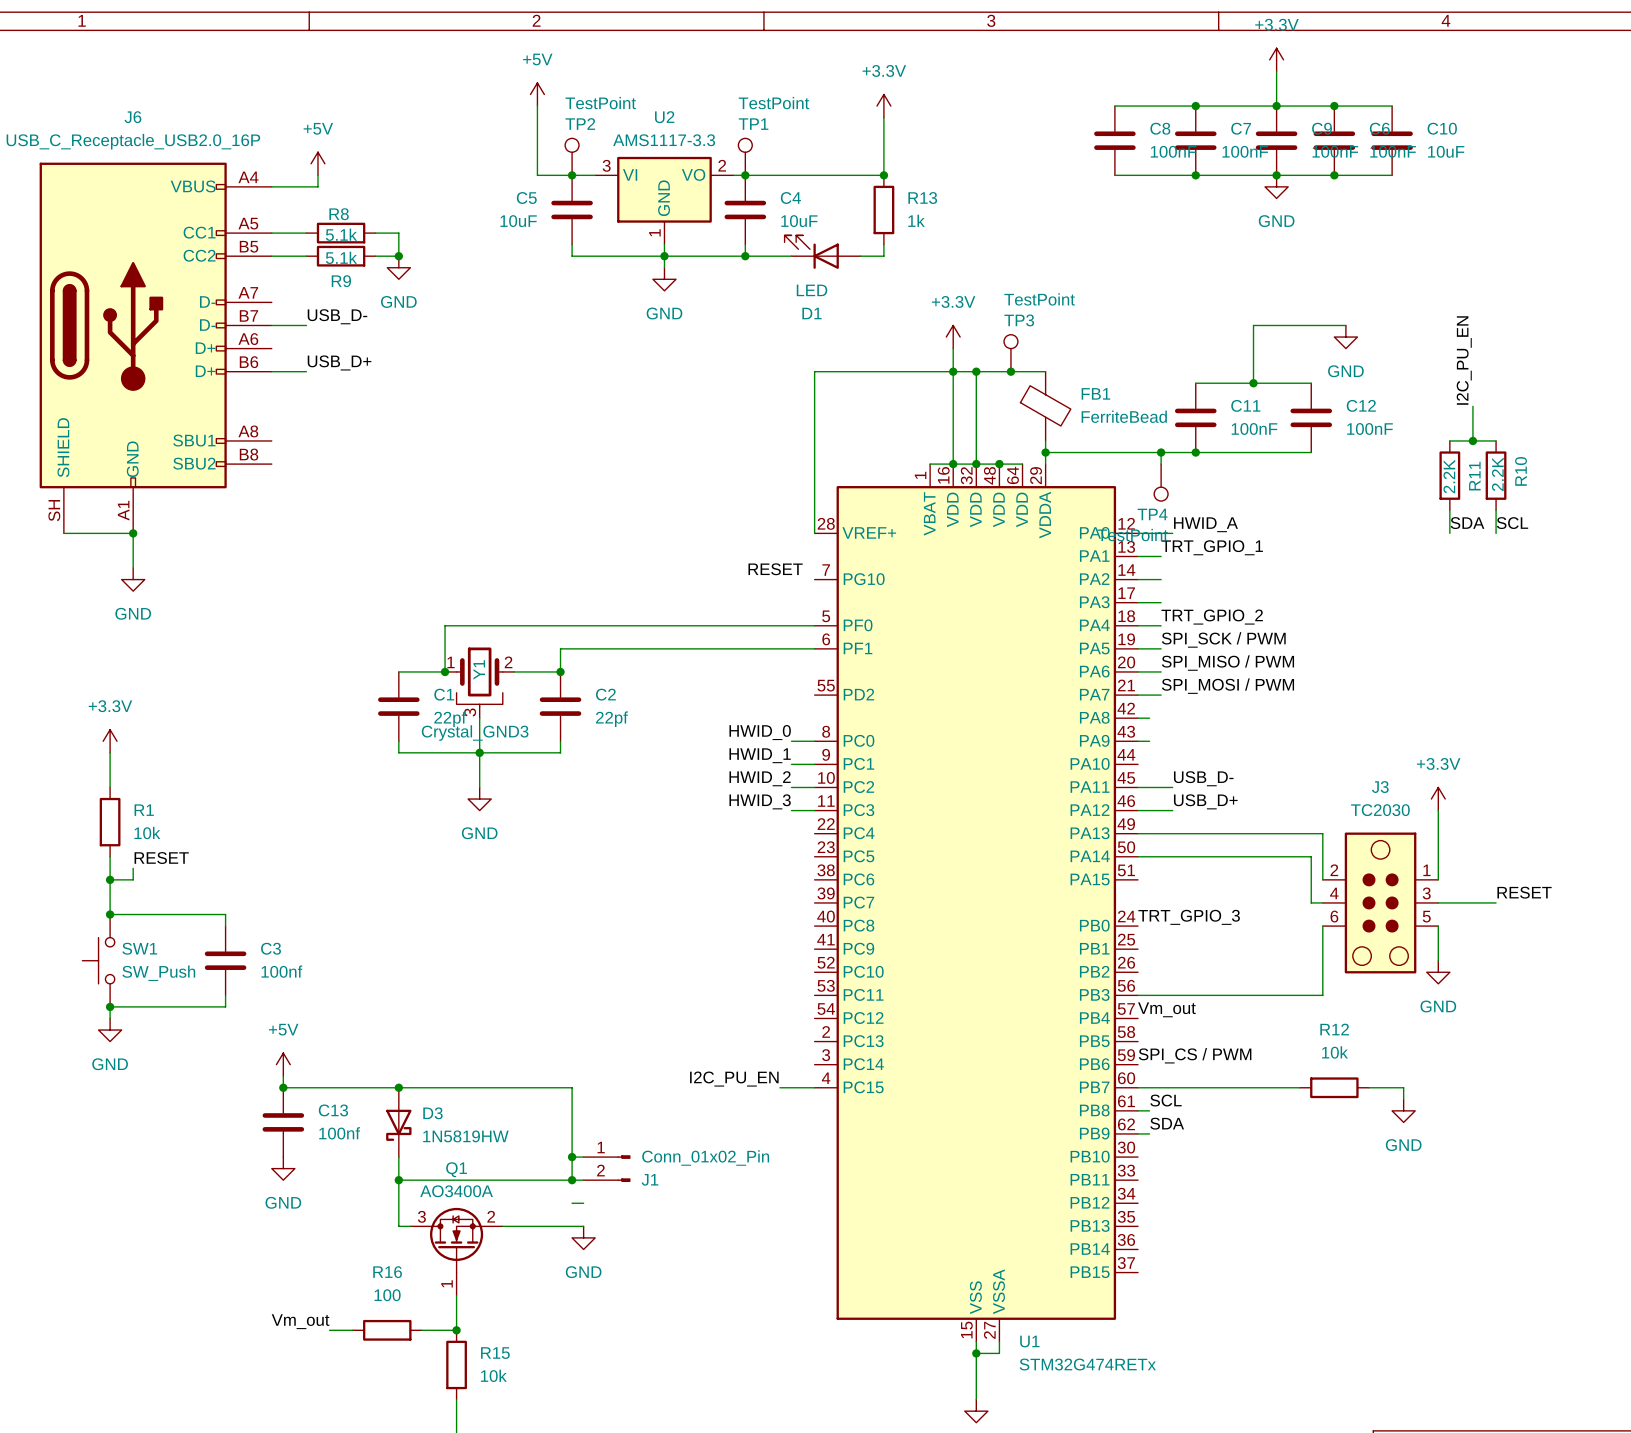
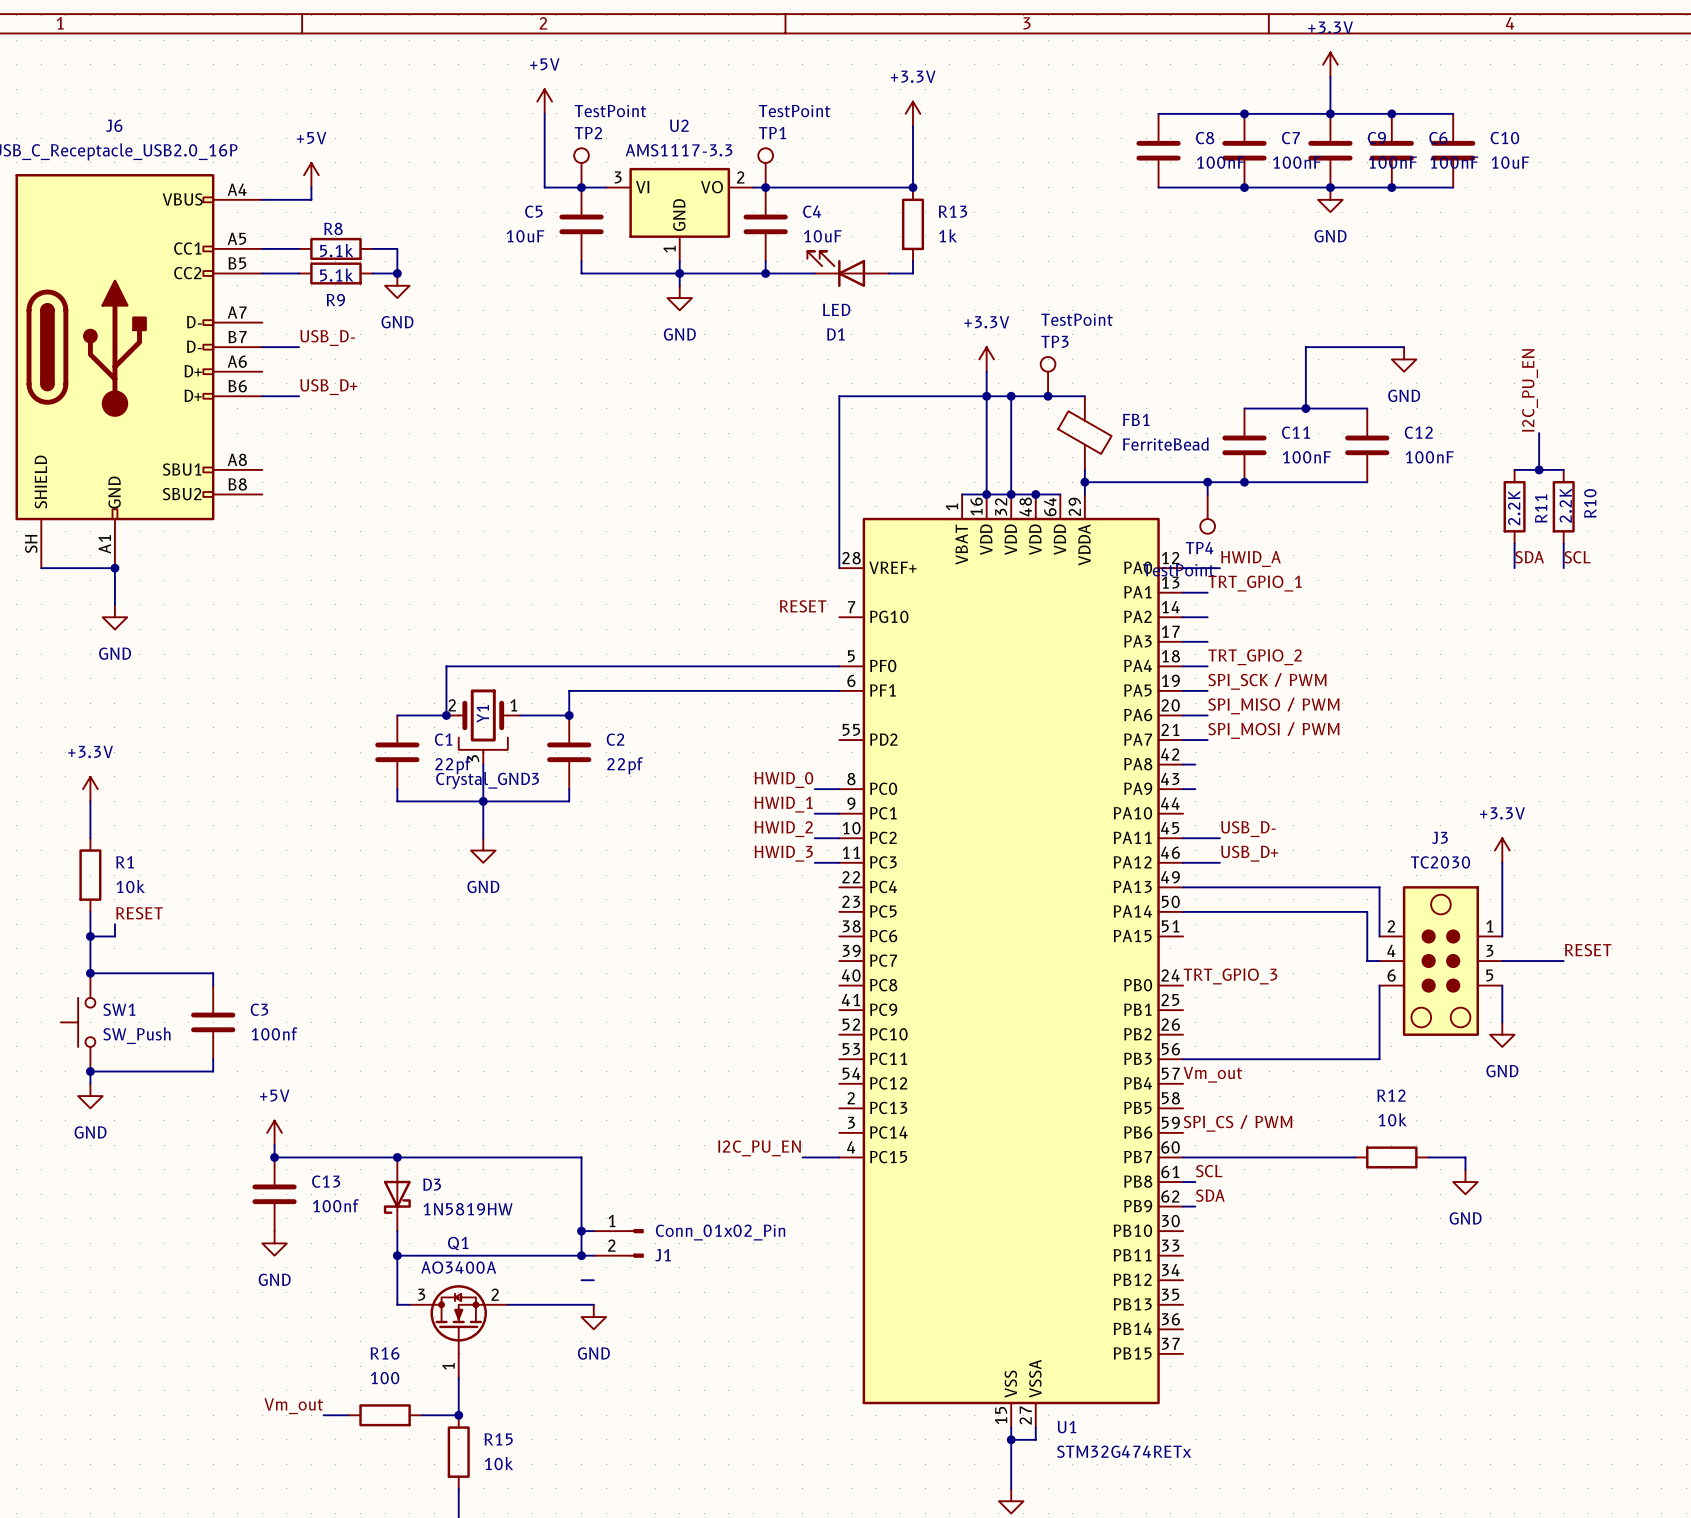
Y1 flip: as is (479, 677) -> left-right (483, 720)

